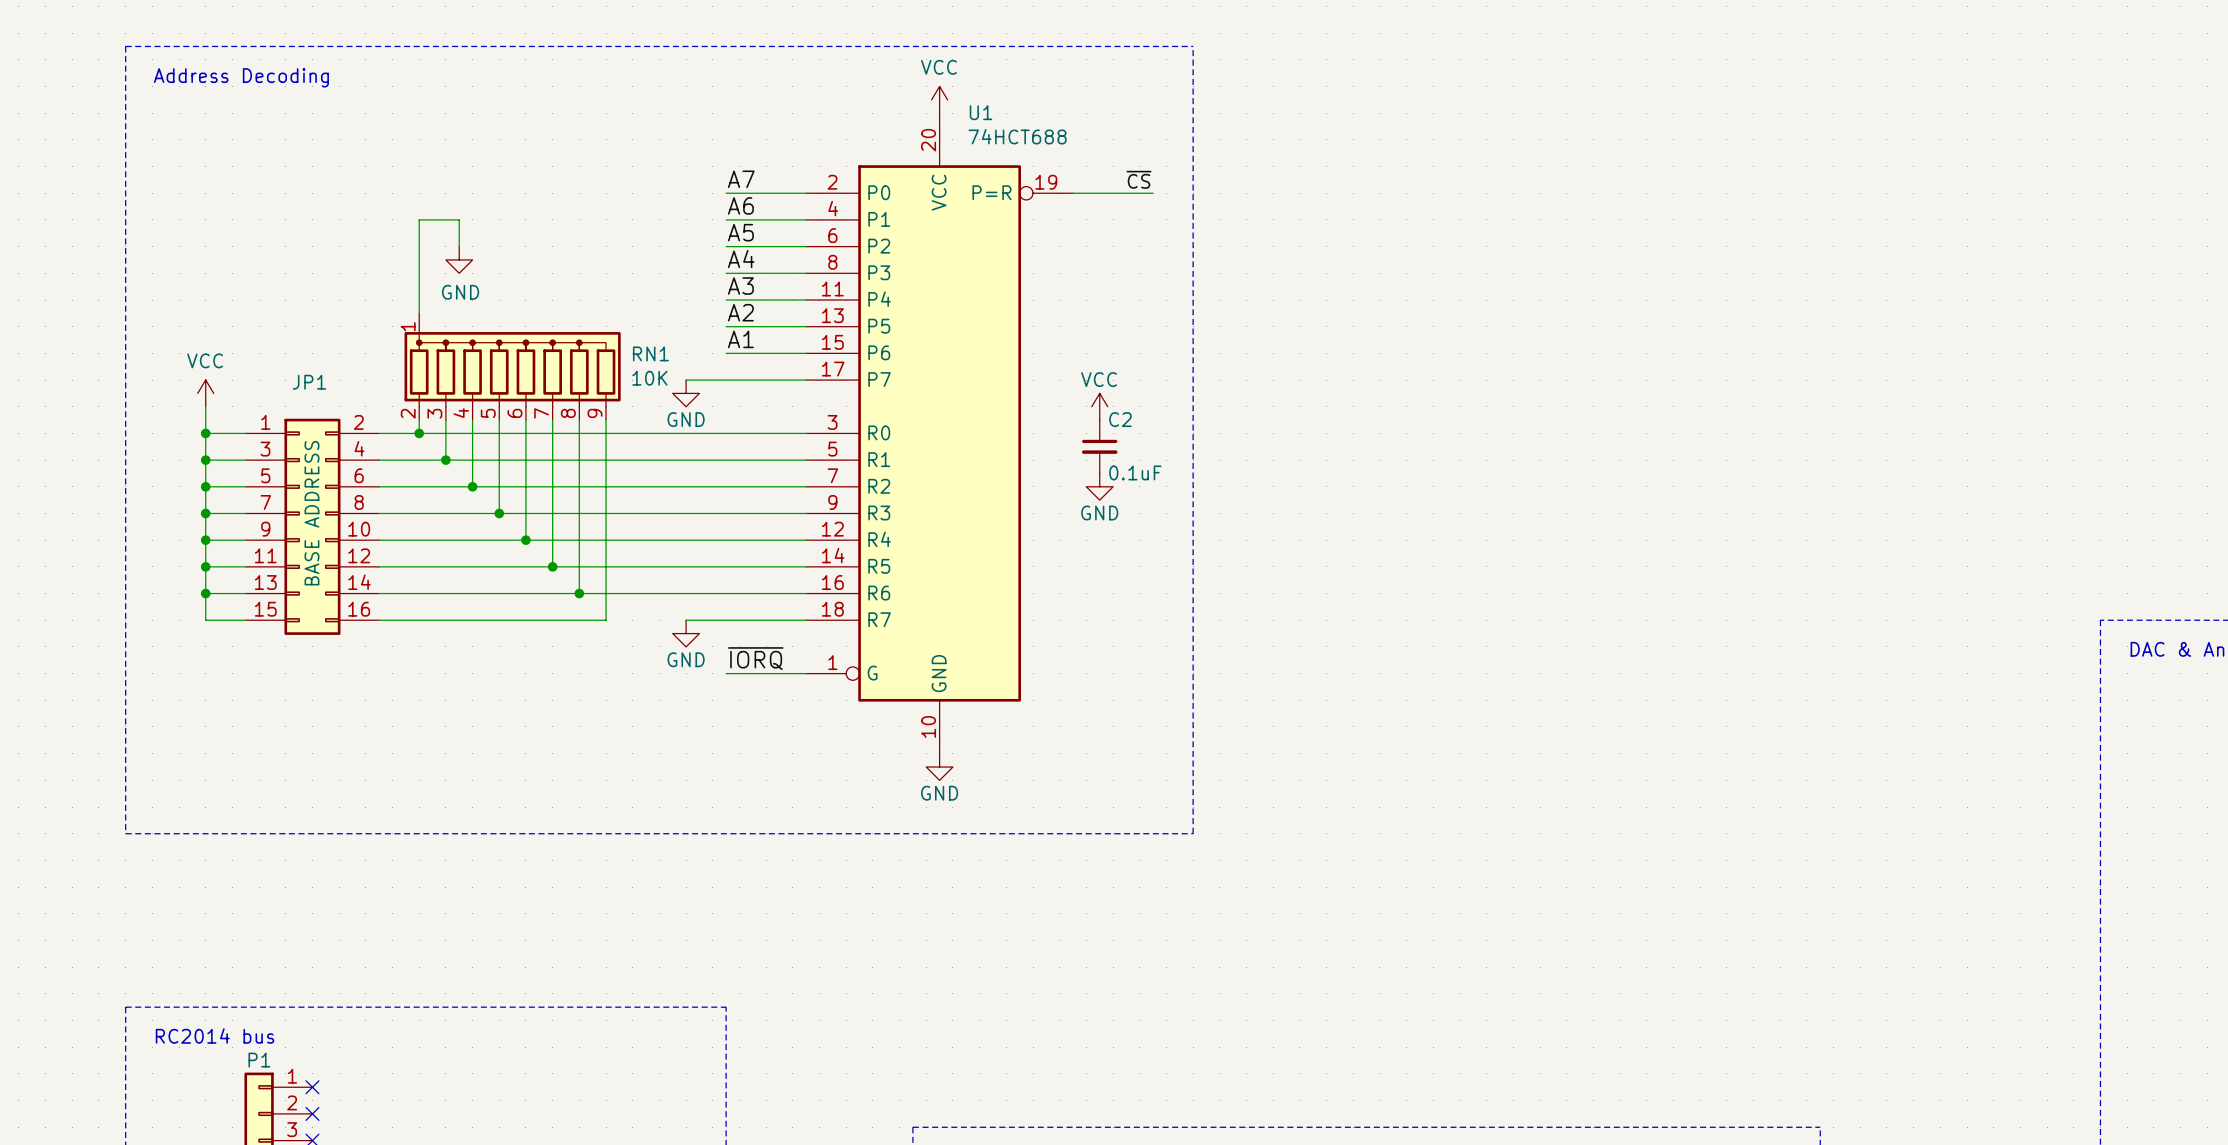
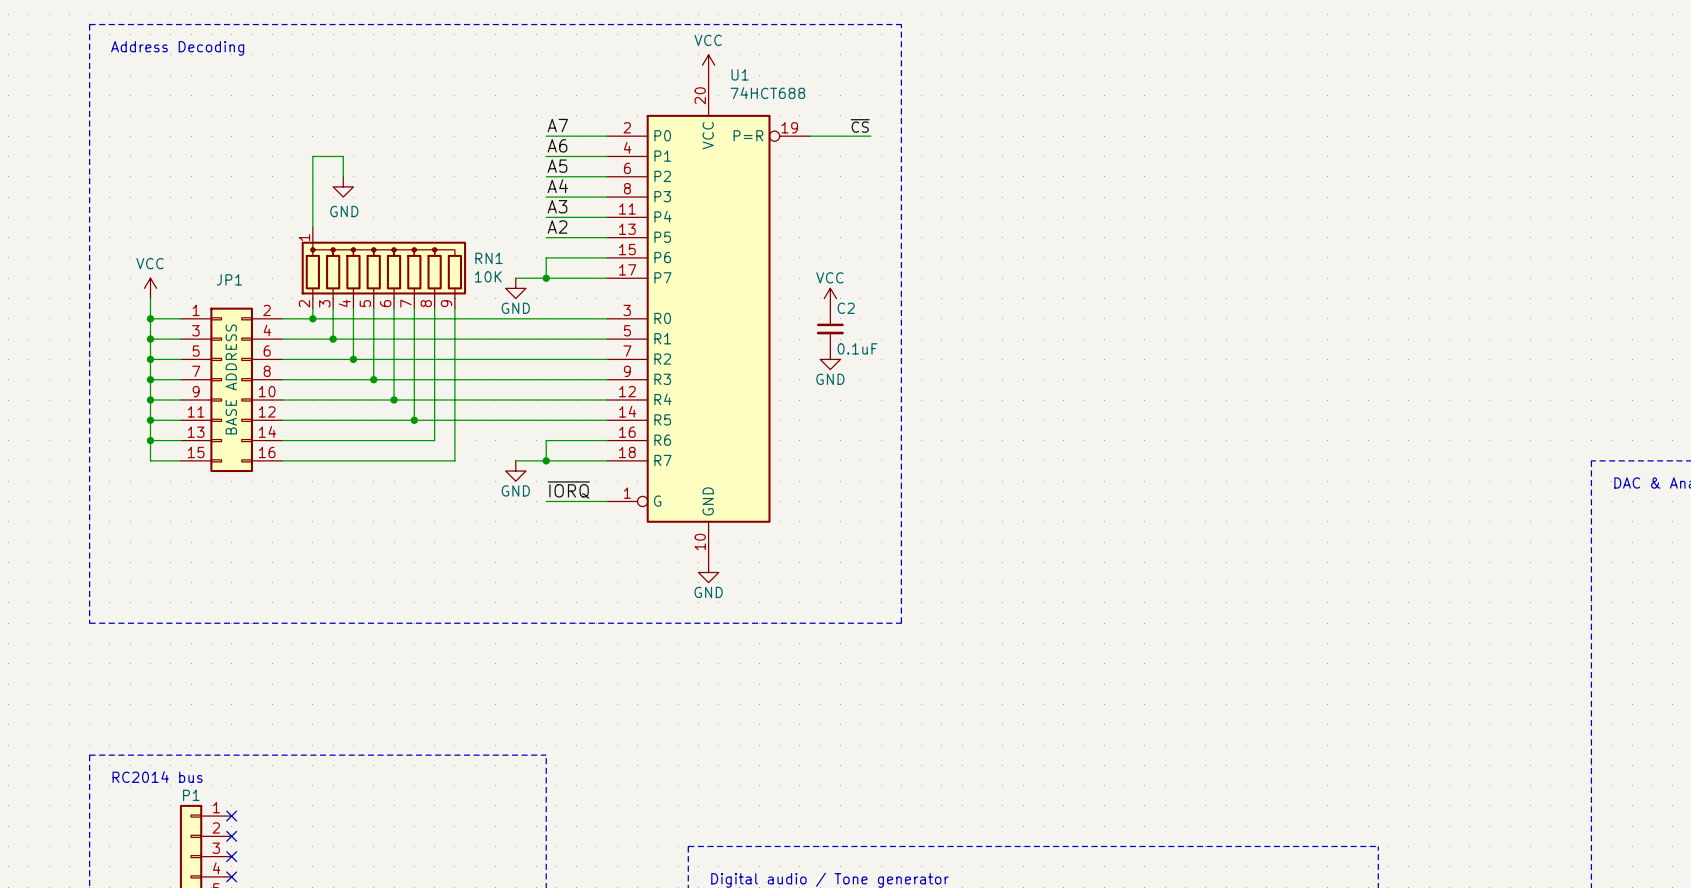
label: A1 (740, 339) -> none
wire: none -> (546, 257) (546, 278)
junction: none -> (546, 278)
wire: (579, 593) (726, 593) -> (546, 460) (546, 440)
junction: (579, 593) -> none
junction: none -> (546, 460)

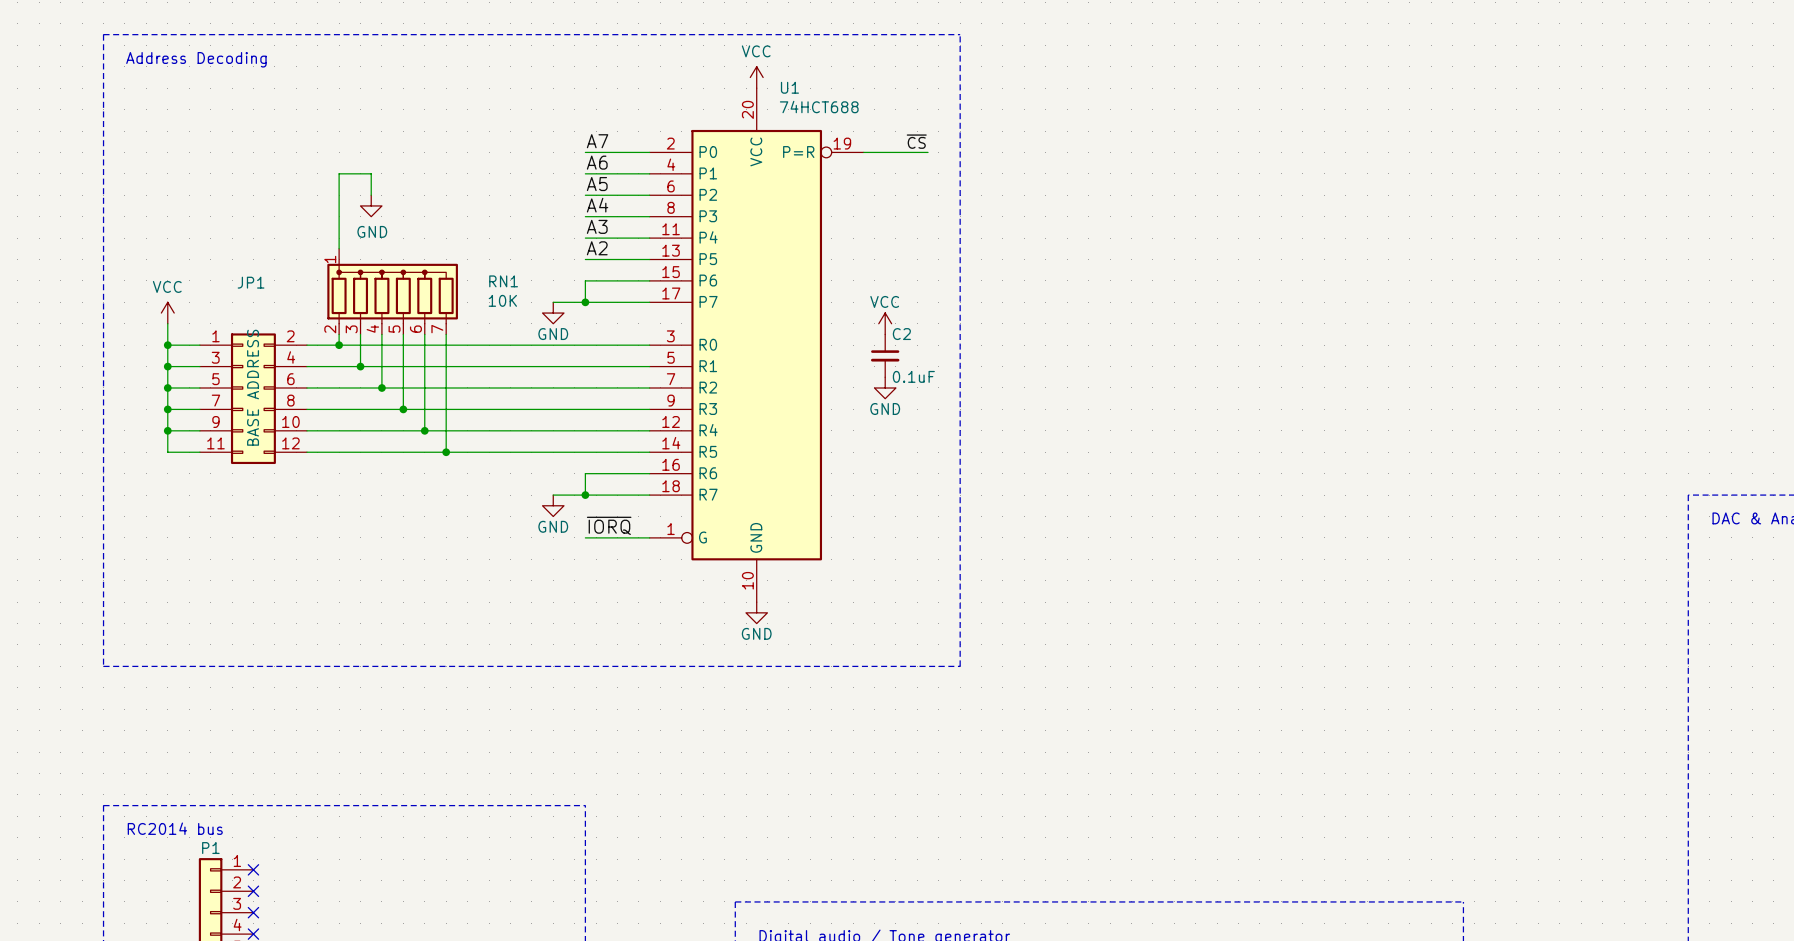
RN1 symbol: [301, 227, 467, 309] -> [327, 248, 458, 335]
JP1 symbol: [180, 307, 283, 473] -> [199, 333, 307, 465]
wire: (434, 308) (434, 440) (282, 440) -> none
wire: (454, 308) (454, 460) (282, 460) -> none
wire: (150, 420) (150, 460) (180, 460) -> none
junction: (150, 420) -> none
wire: (150, 440) (180, 440) -> none
junction: (150, 440) -> none

